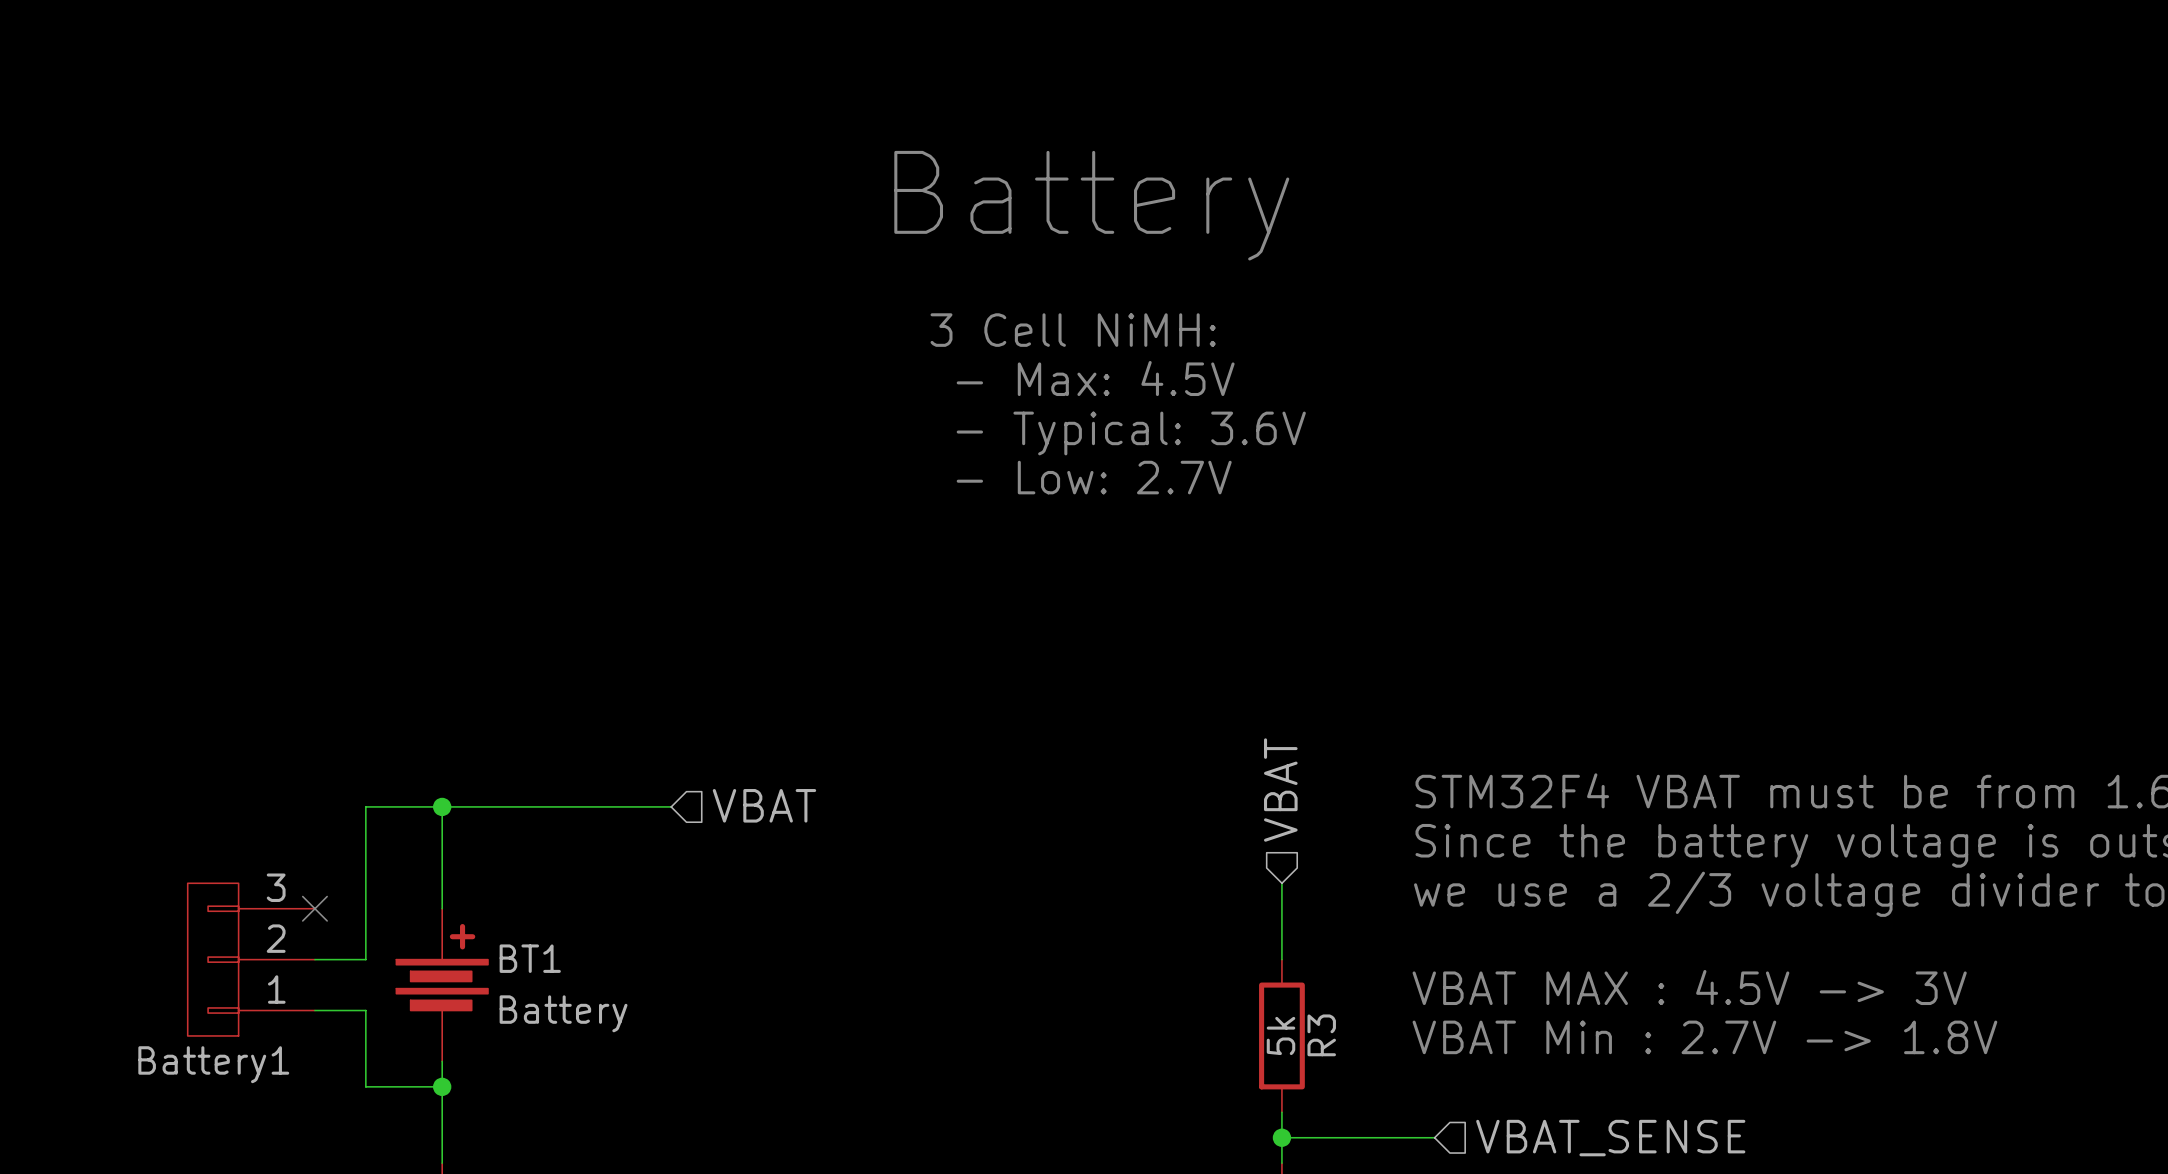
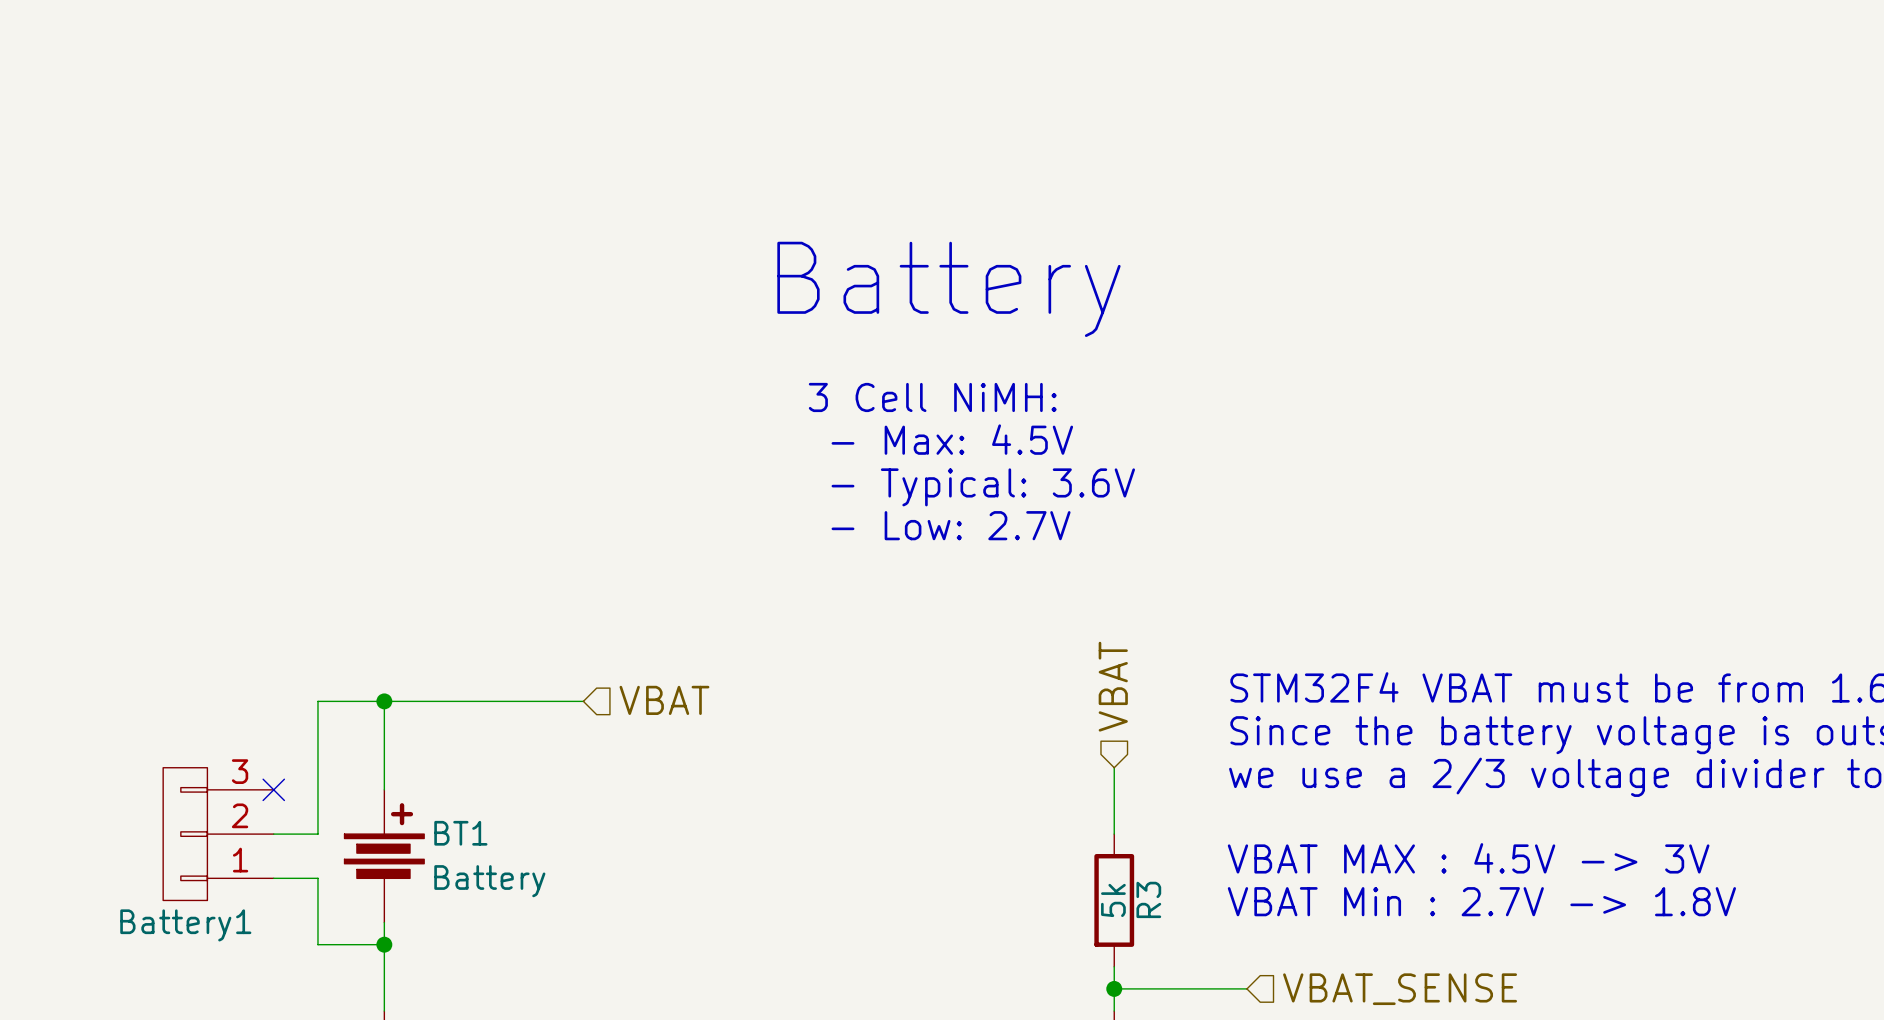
text position: Battery (1091, 205) -> Battery (948, 289)
text position: 3 Cell NiMH: (1073, 330) -> 3 Cell NiMH: (932, 397)
text position: - Max: 4.5V (1095, 378) -> - Max: 4.5V (952, 439)
text position: - Typical: 3.6V (1131, 433) -> - Typical: 3.6V (983, 487)
text position: - Low: 2.7V (1094, 477) -> - Low: 2.7V (951, 525)

